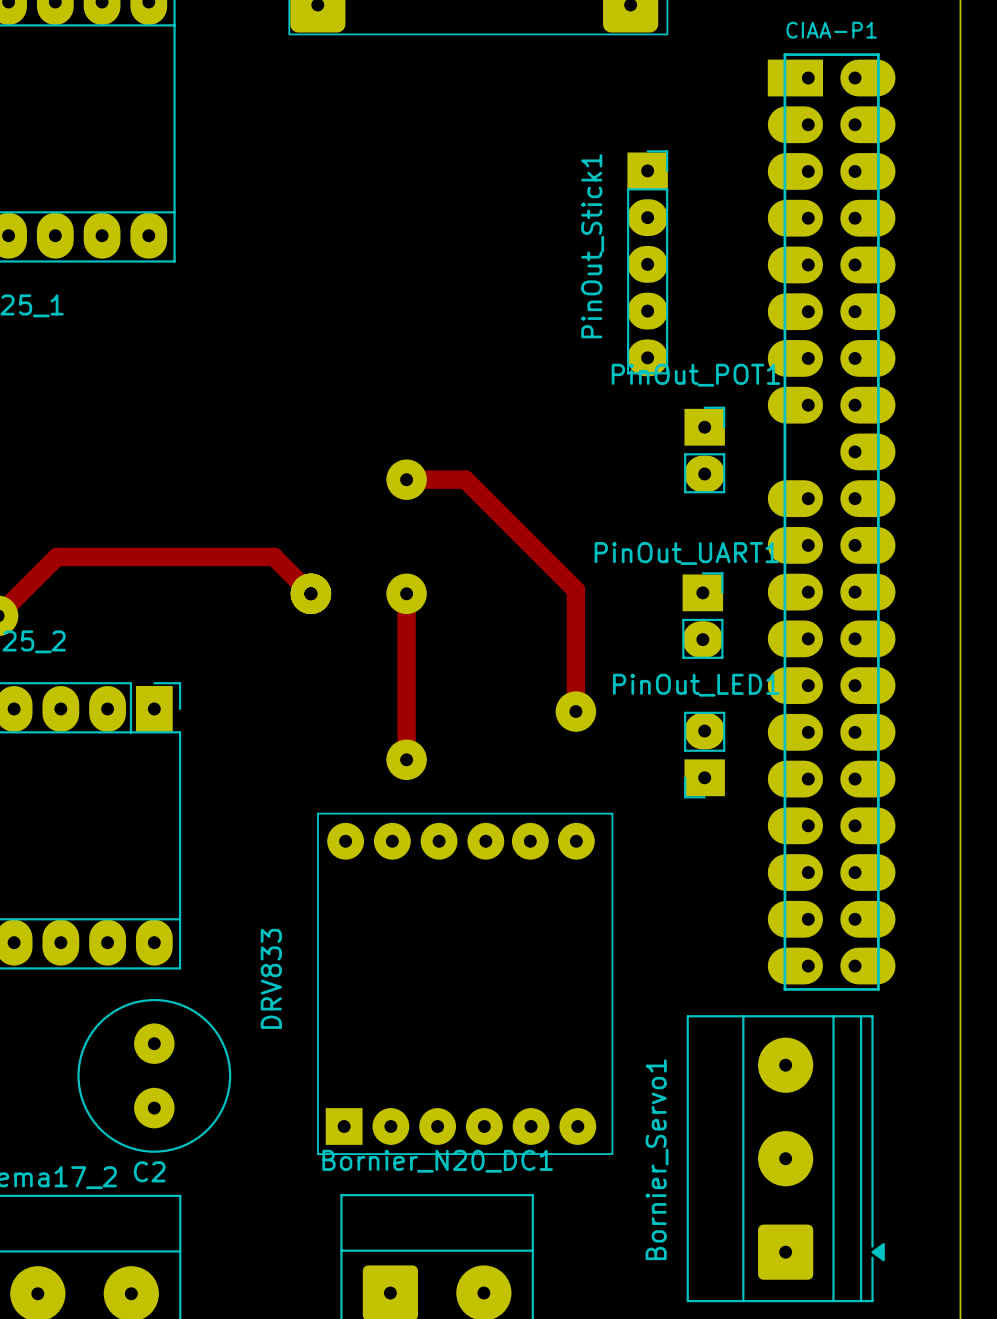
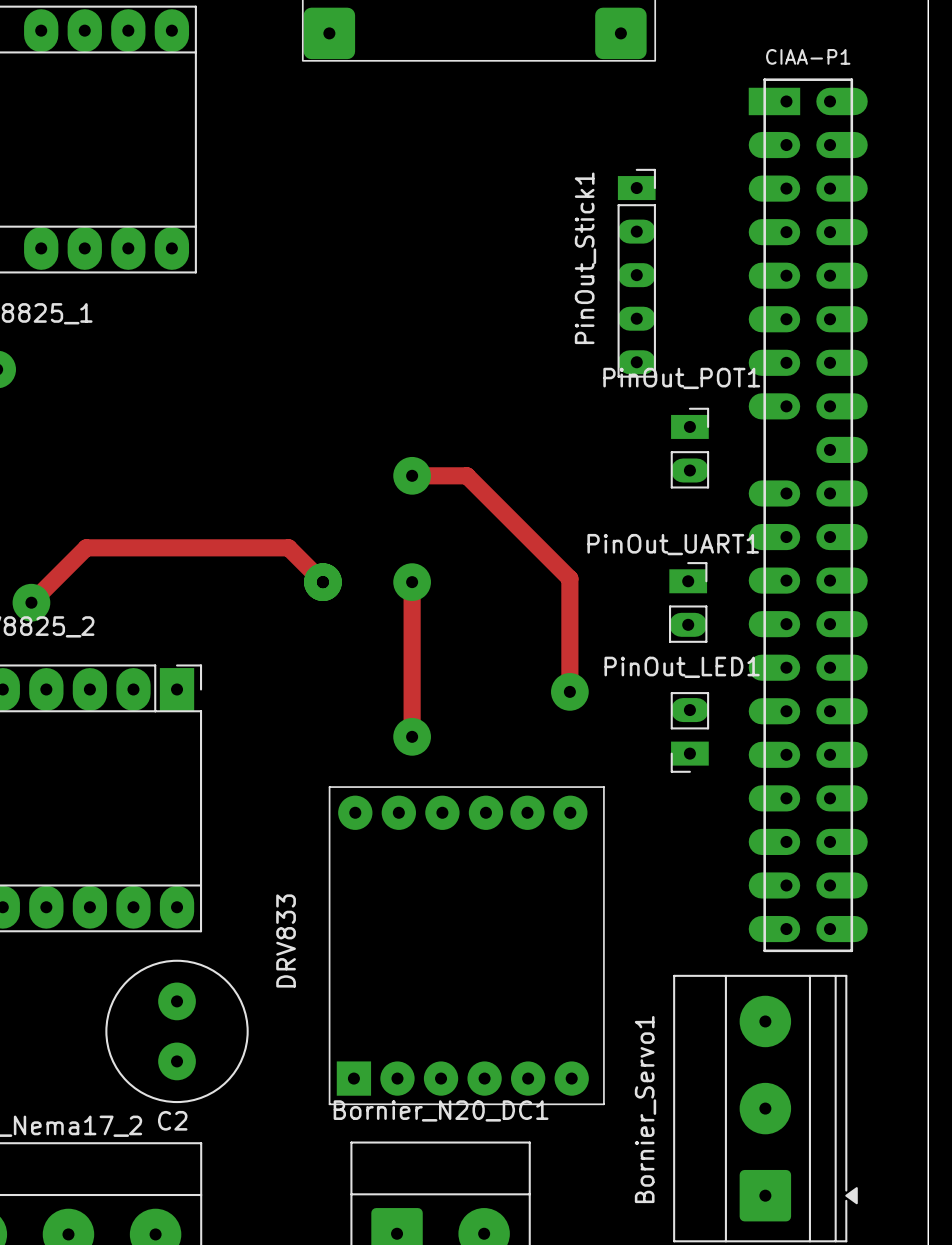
CIAA-P1 footprint: [767, 53, 896, 991] -> [748, 78, 868, 953]
PinOut_Stick1 footprint: [627, 150, 669, 377] -> [617, 168, 656, 378]
PinOut_POT1 footprint: [684, 406, 726, 494] -> [670, 407, 710, 489]
PinOut_UART1 footprint: [682, 572, 724, 659] -> [669, 562, 708, 643]
PinOut_LED1 footprint: [684, 711, 726, 799] -> [670, 692, 710, 773]

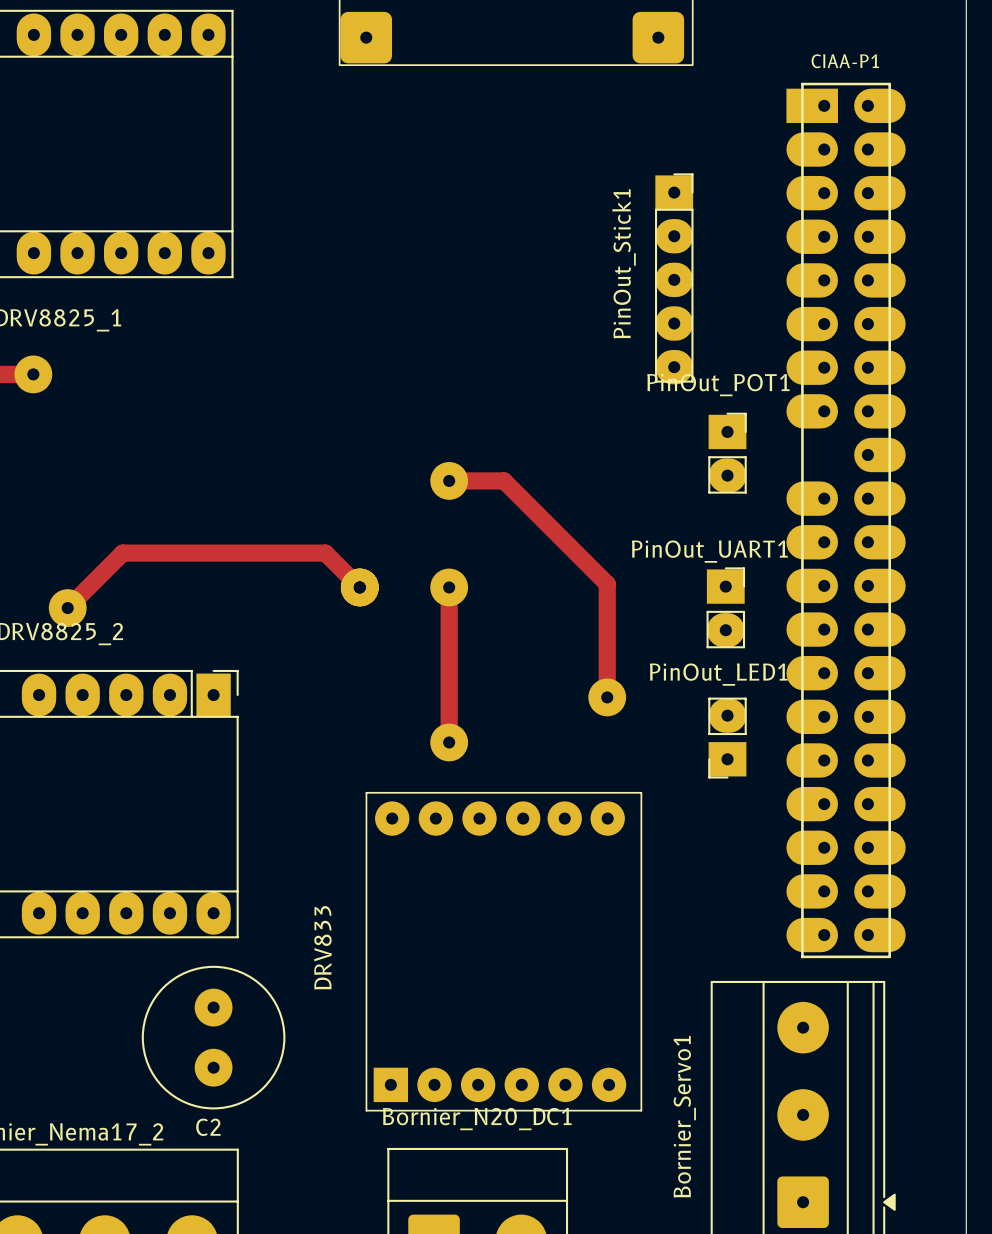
CIAA-P1 footprint: [748, 78, 868, 953] -> [786, 82, 906, 959]
PinOut_Stick1 footprint: [617, 168, 656, 378] -> [655, 173, 694, 385]
PinOut_POT1 footprint: [670, 407, 710, 489] -> [708, 412, 747, 494]
PinOut_UART1 footprint: [669, 562, 708, 643] -> [706, 567, 746, 649]
PinOut_LED1 footprint: [670, 692, 710, 773] -> [708, 697, 747, 779]

